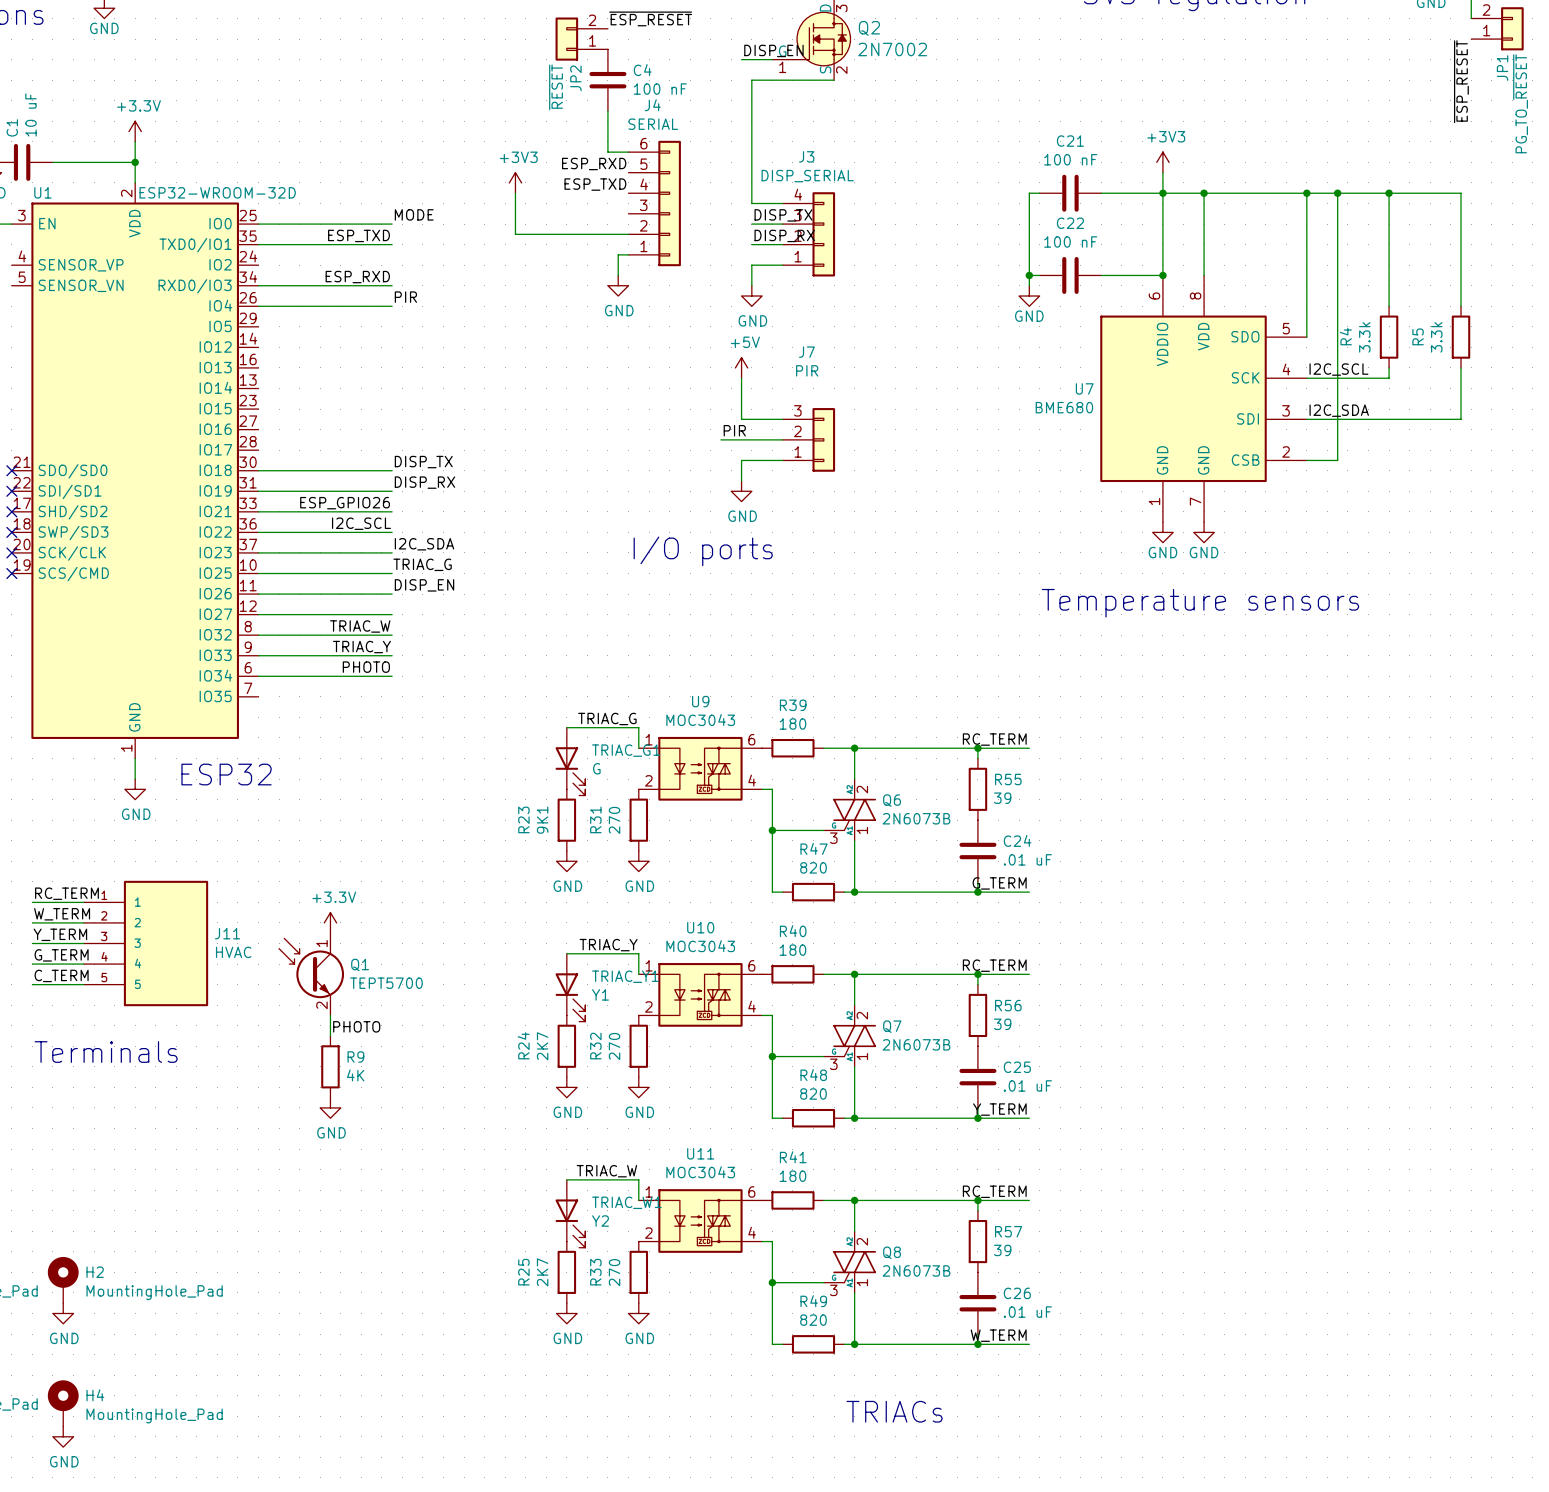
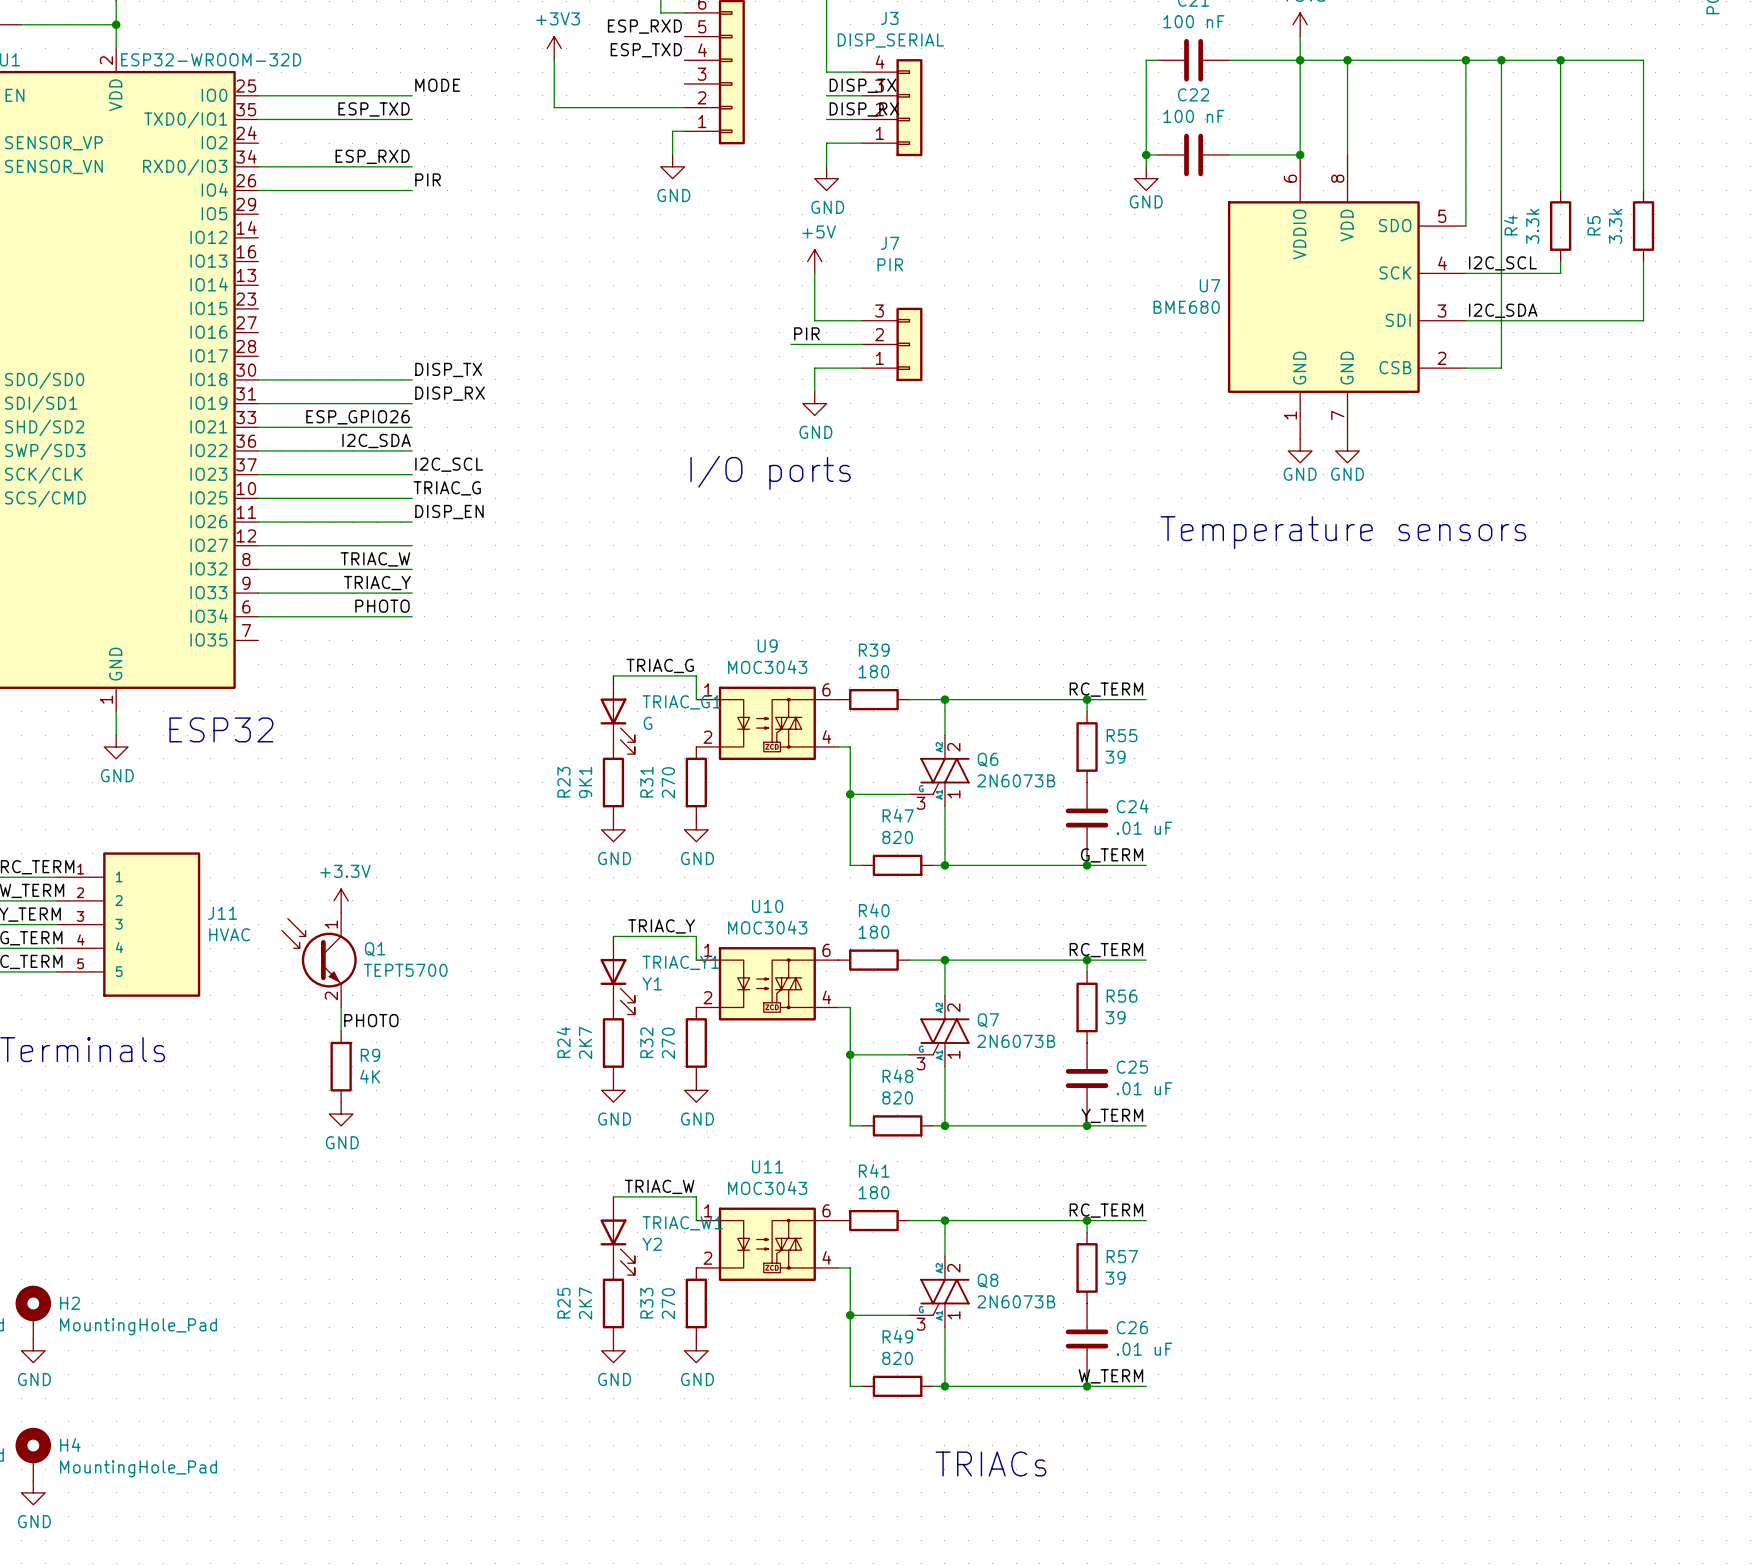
label: I2C_SCL (361, 523) -> I2C_SDA (376, 440)
label: I2C_SDA (424, 544) -> I2C_SCL (449, 464)

